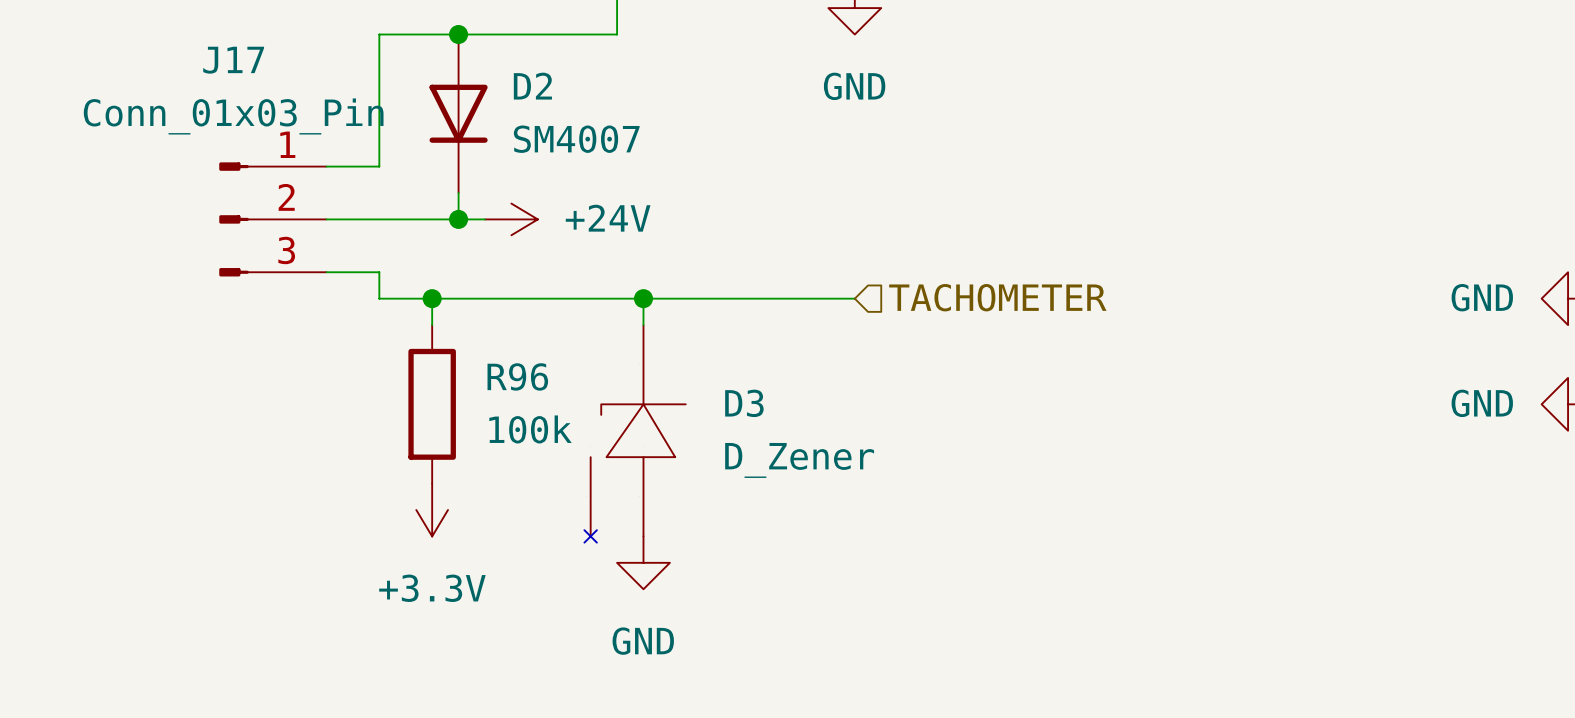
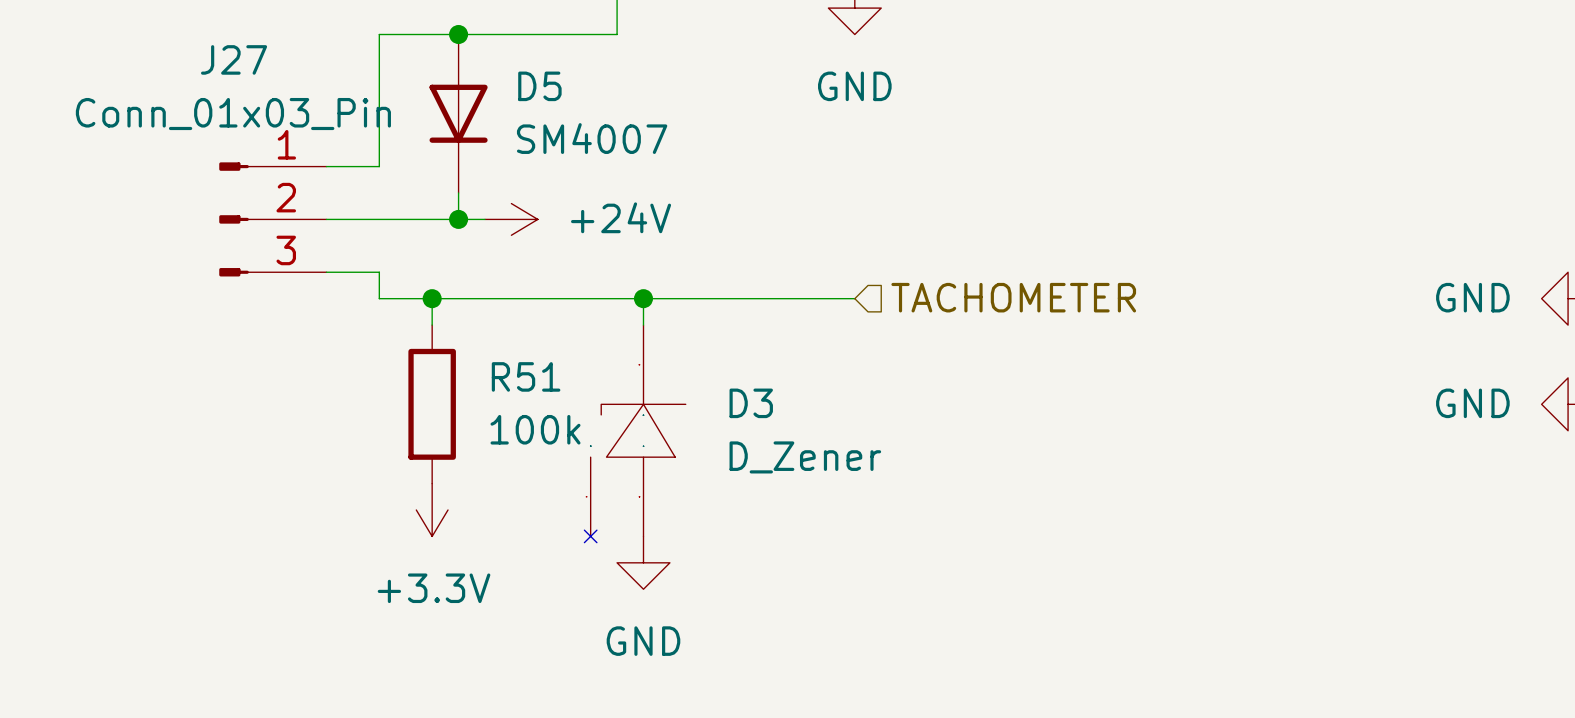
J17 name: J17 (233, 60) -> J27 (234, 59)
D2 name: D2 (532, 86) -> D5 (539, 86)
R96 name: R96 (517, 376) -> R51 (526, 376)

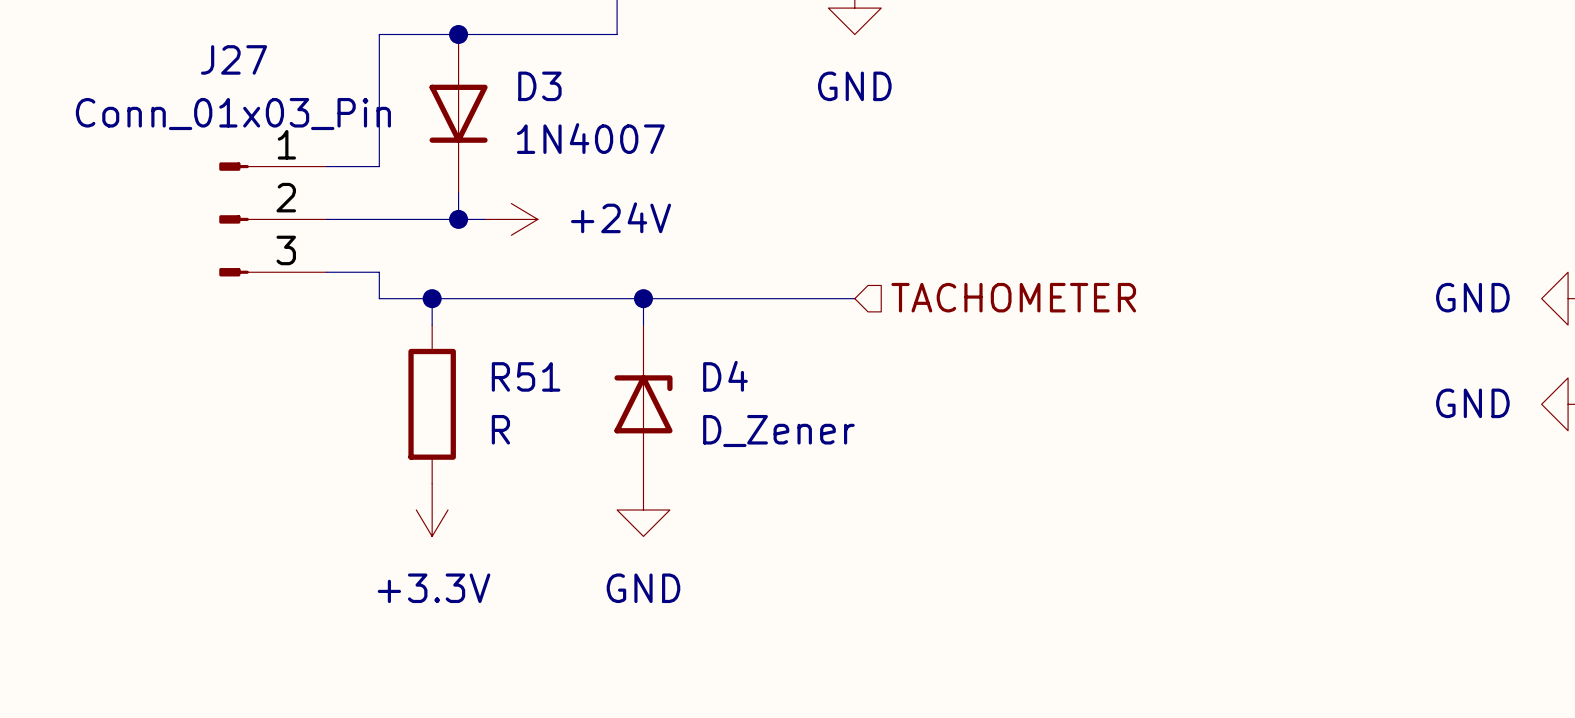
D5 name: D5 (539, 86) -> D3 (539, 86)
D5 value: SM4007 (592, 138) -> 1N4007 (590, 138)
D4: none -> D_Zener (643, 404)
R51 value: 100k (535, 429) -> R (500, 429)
D3: D_Zener (635, 433) -> none
power symbol position: GND (643, 562) -> GND (643, 509)

